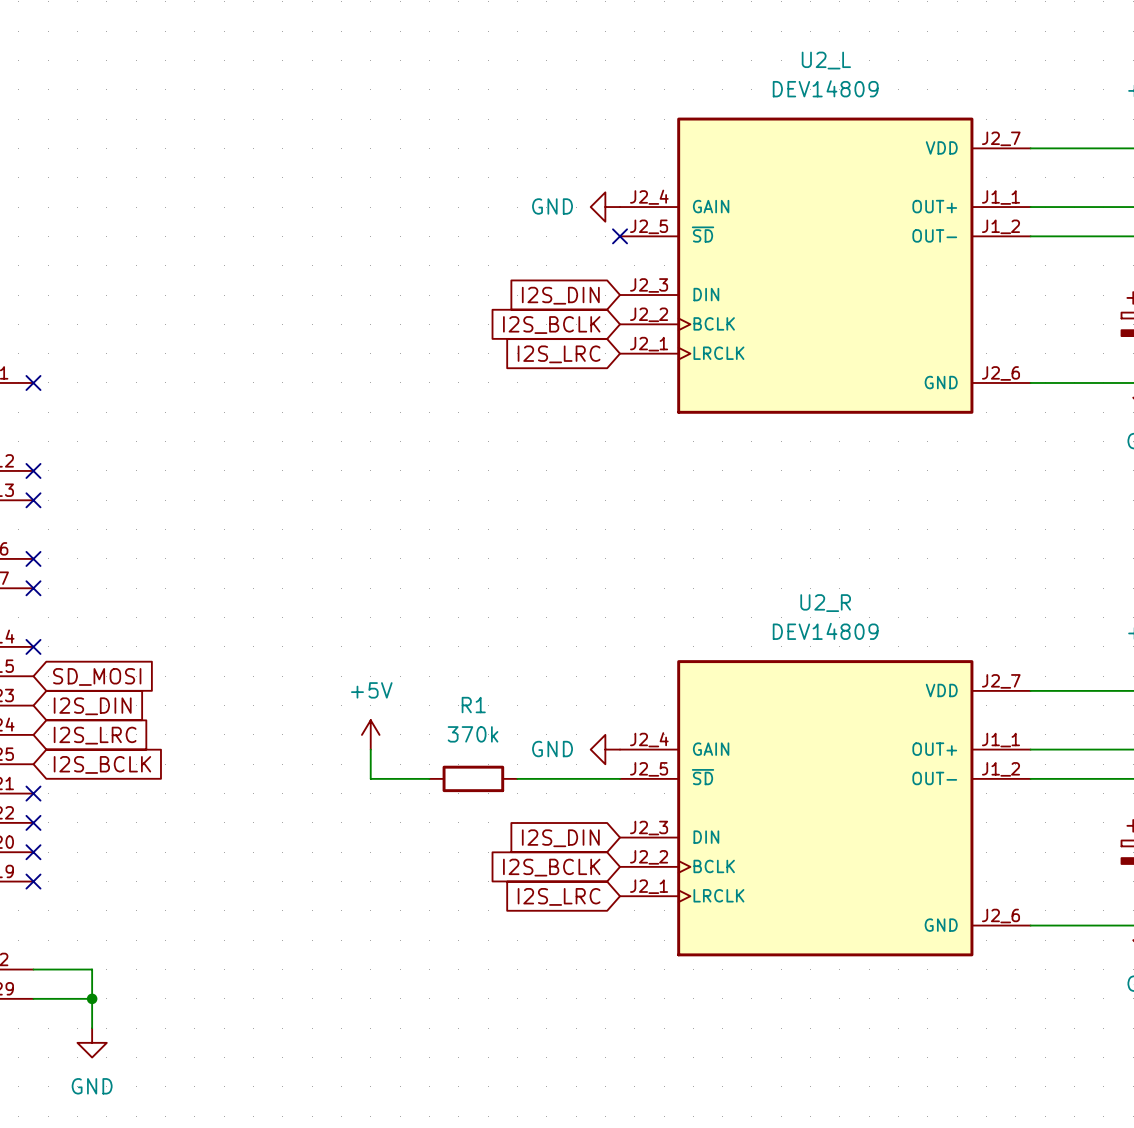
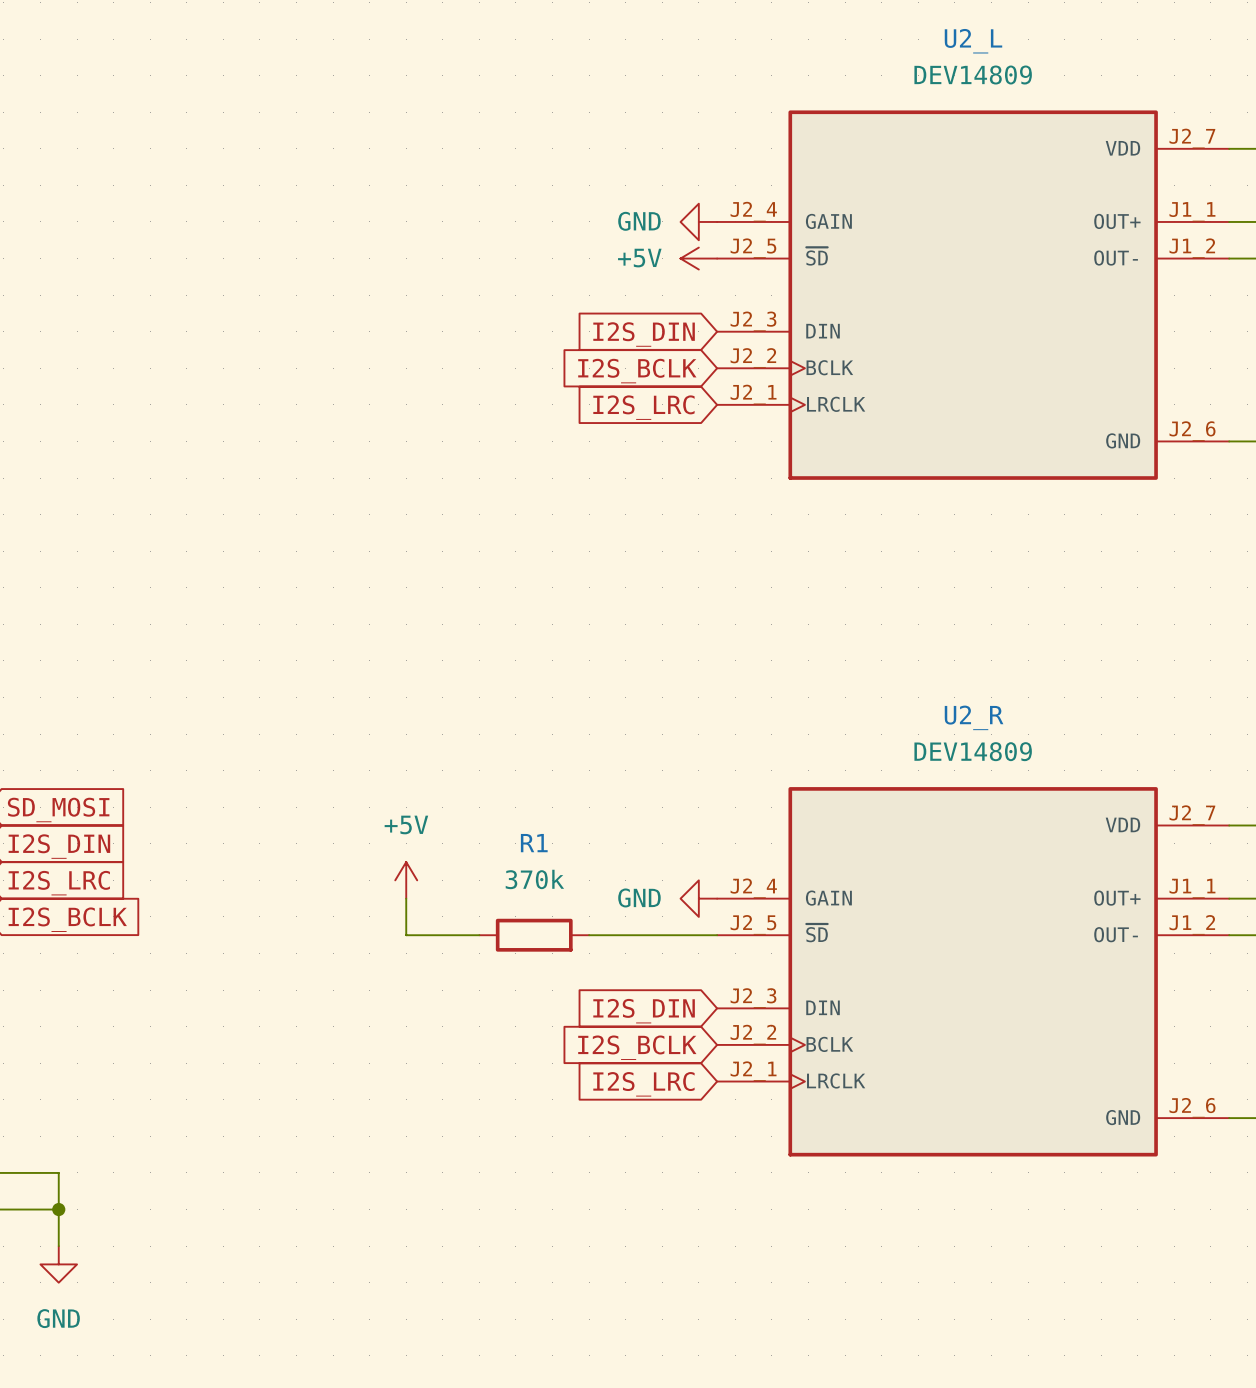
power symbol: none -> +5V (698, 258)
no-connect mark: (620, 236) -> none

